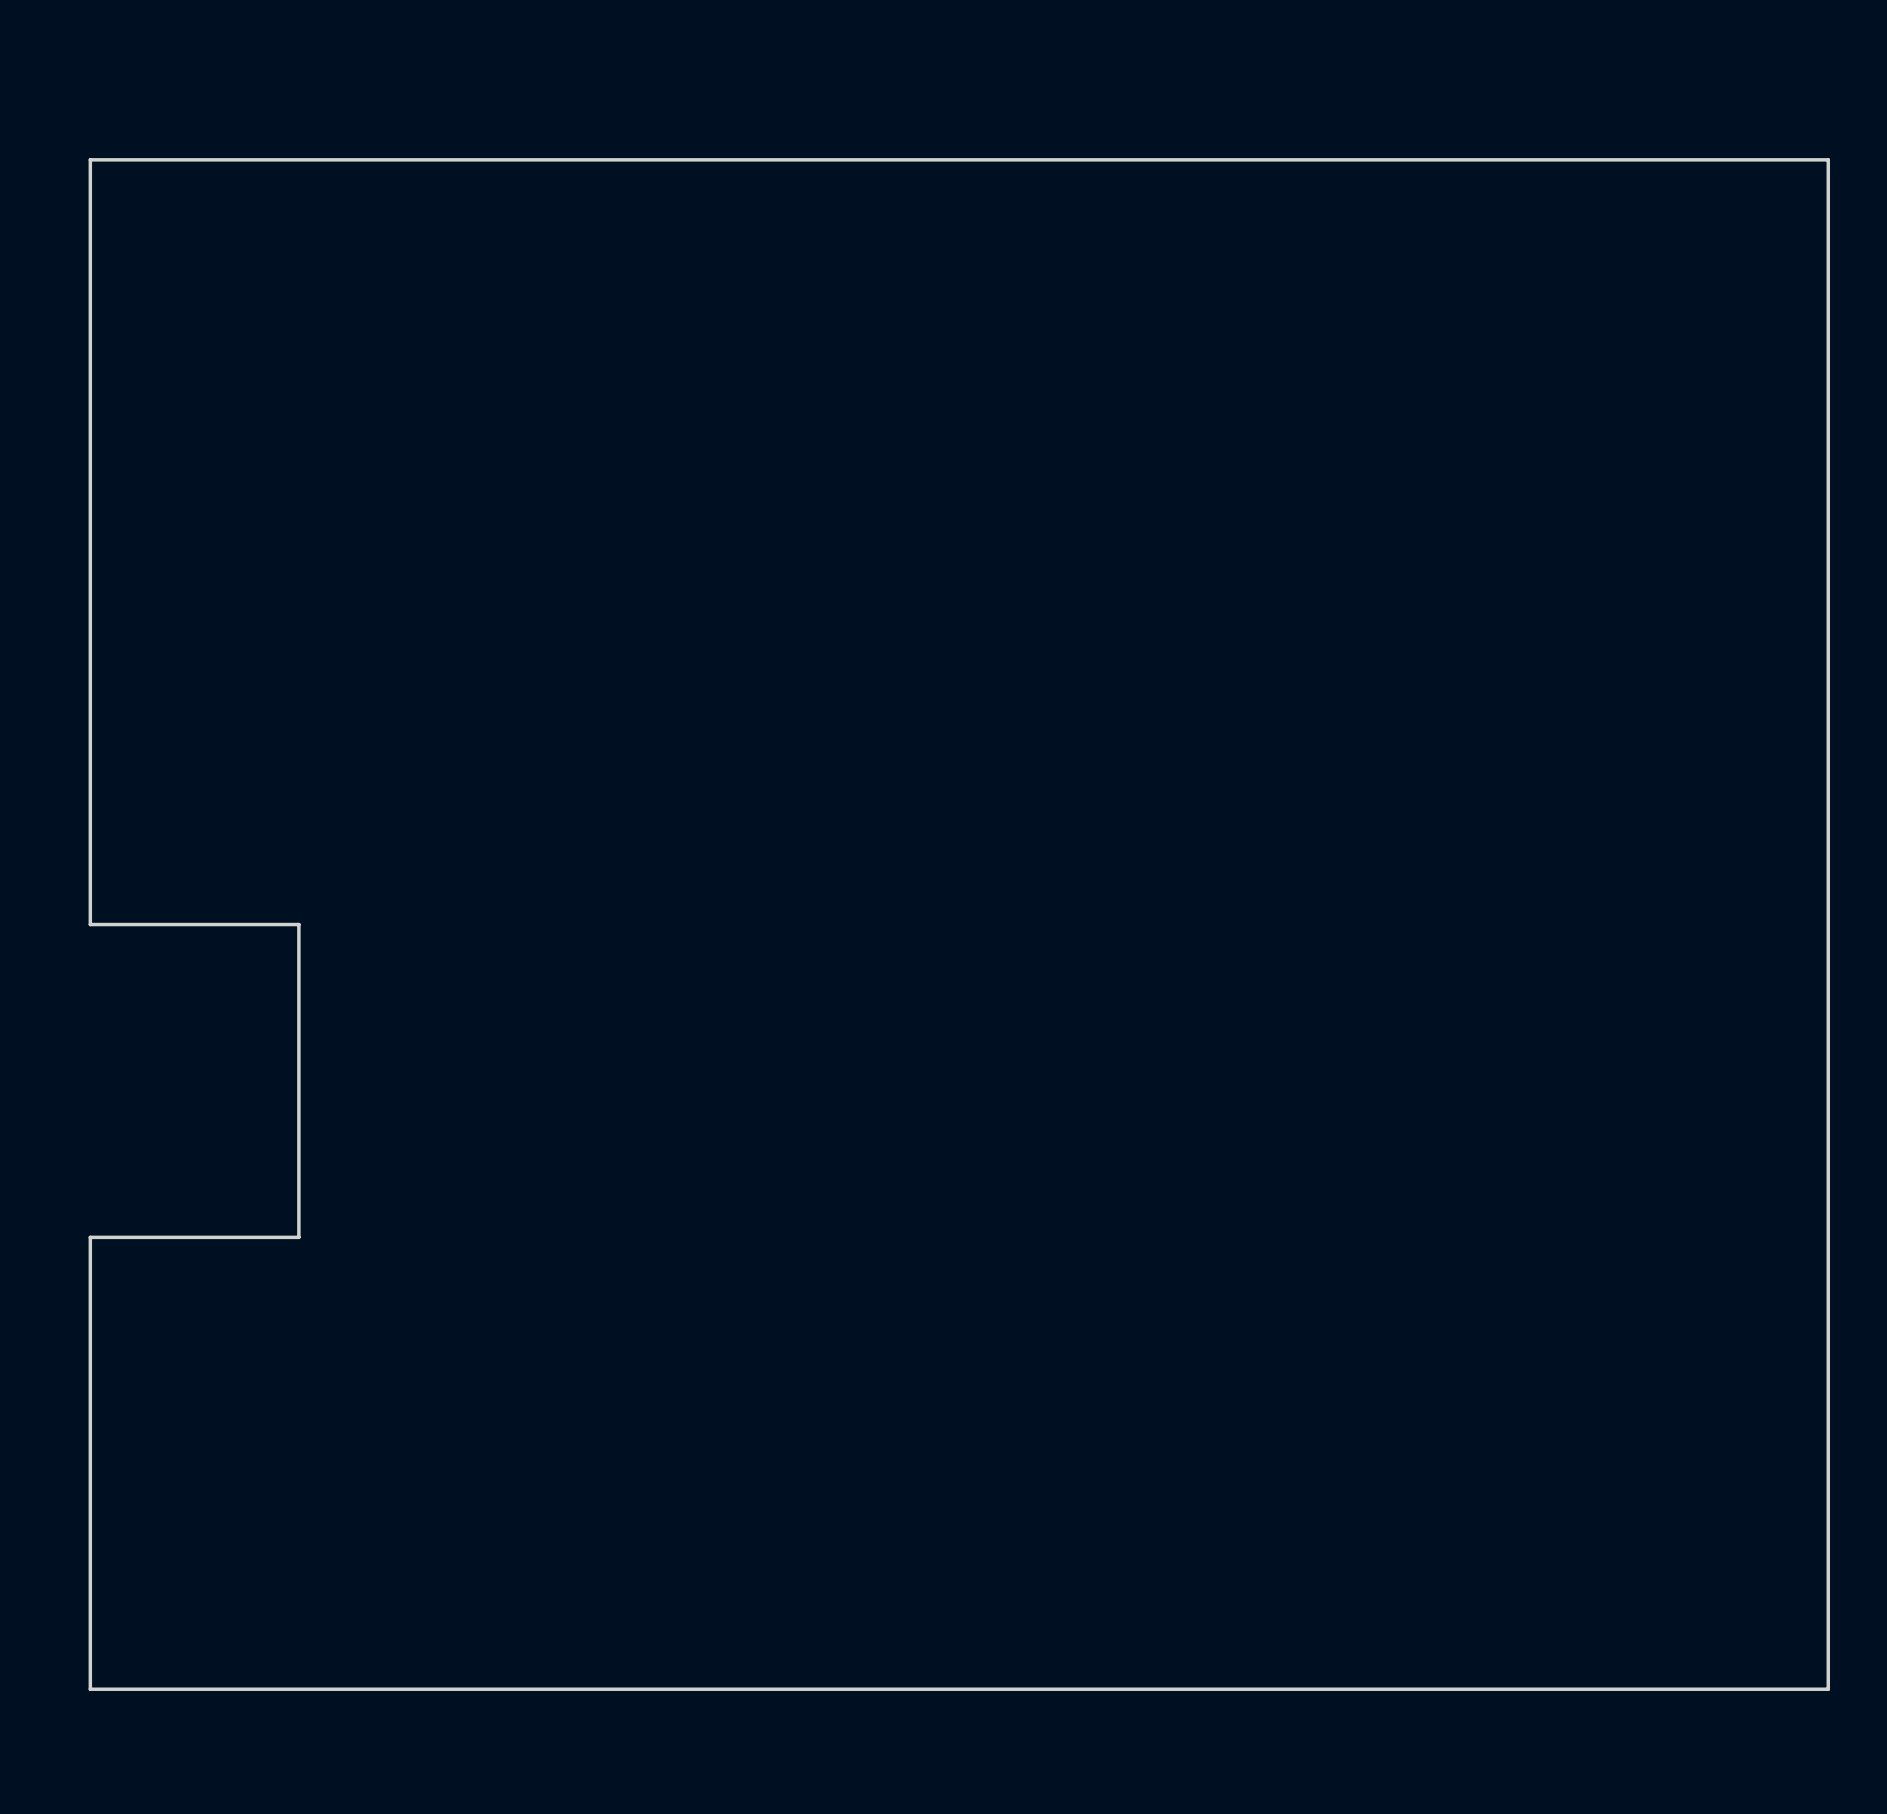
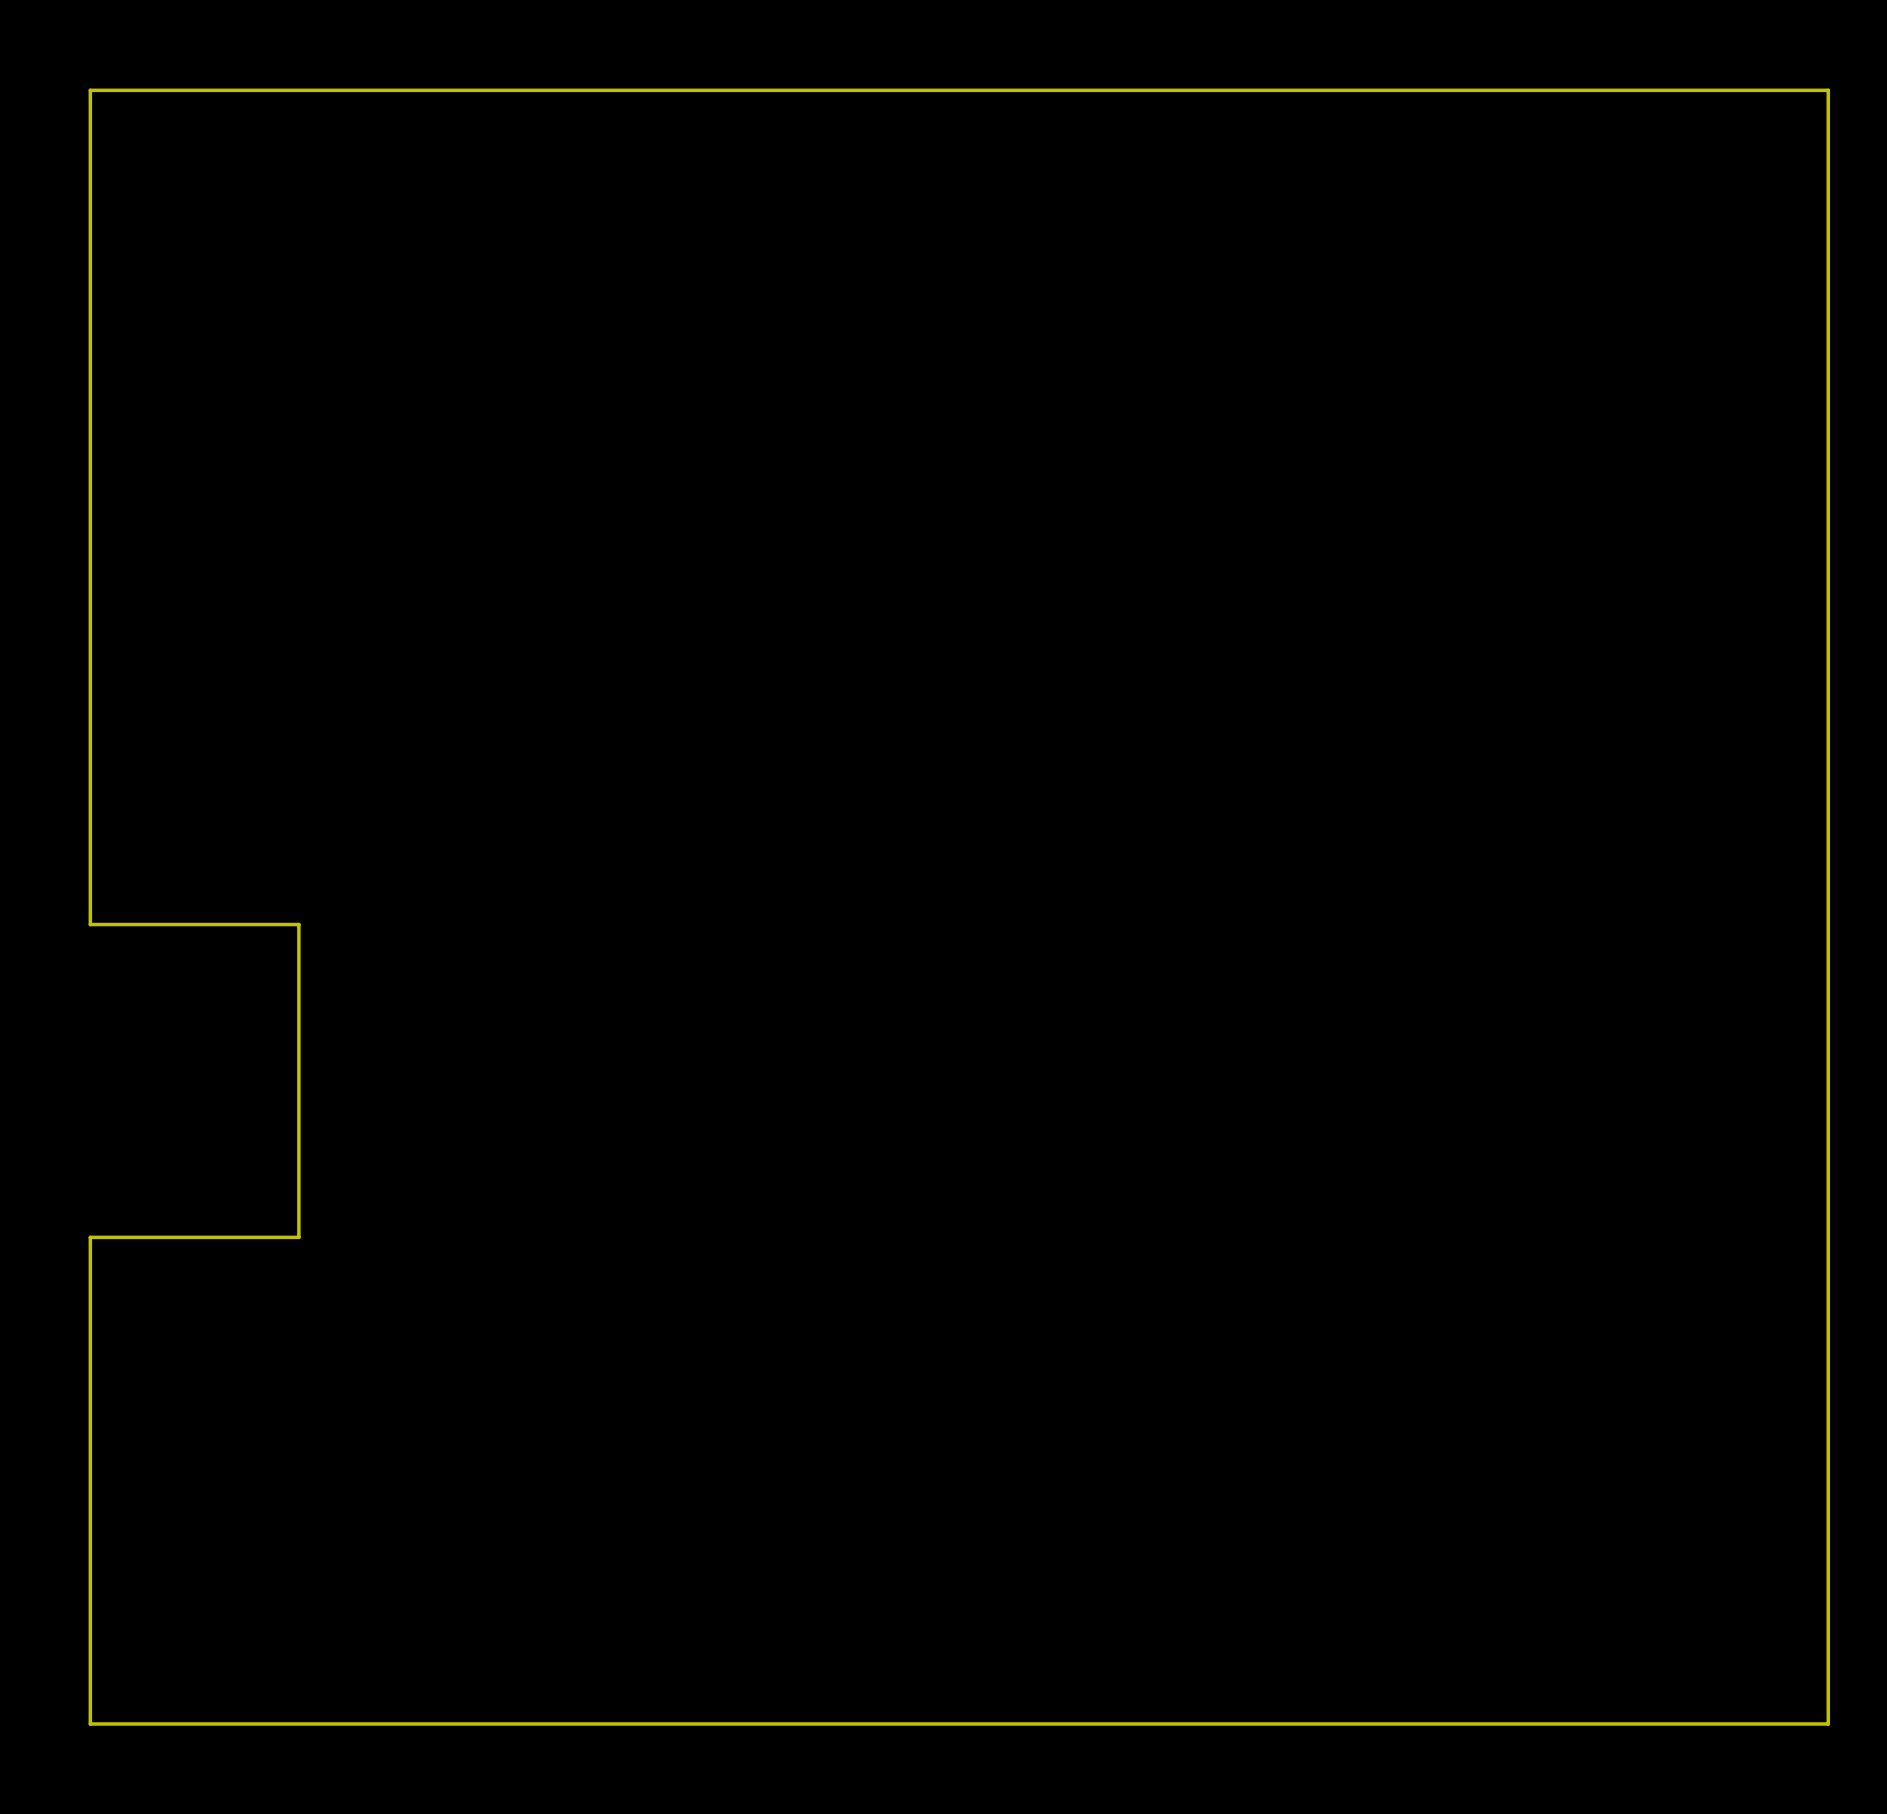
board edge: (1828, 159) (90, 159) -> (1828, 159) (1828, 90) (90, 90) (90, 159)
board edge: (1828, 1689) (90, 1689) -> (1828, 1689) (1828, 1723) (90, 1723) (90, 1689)

